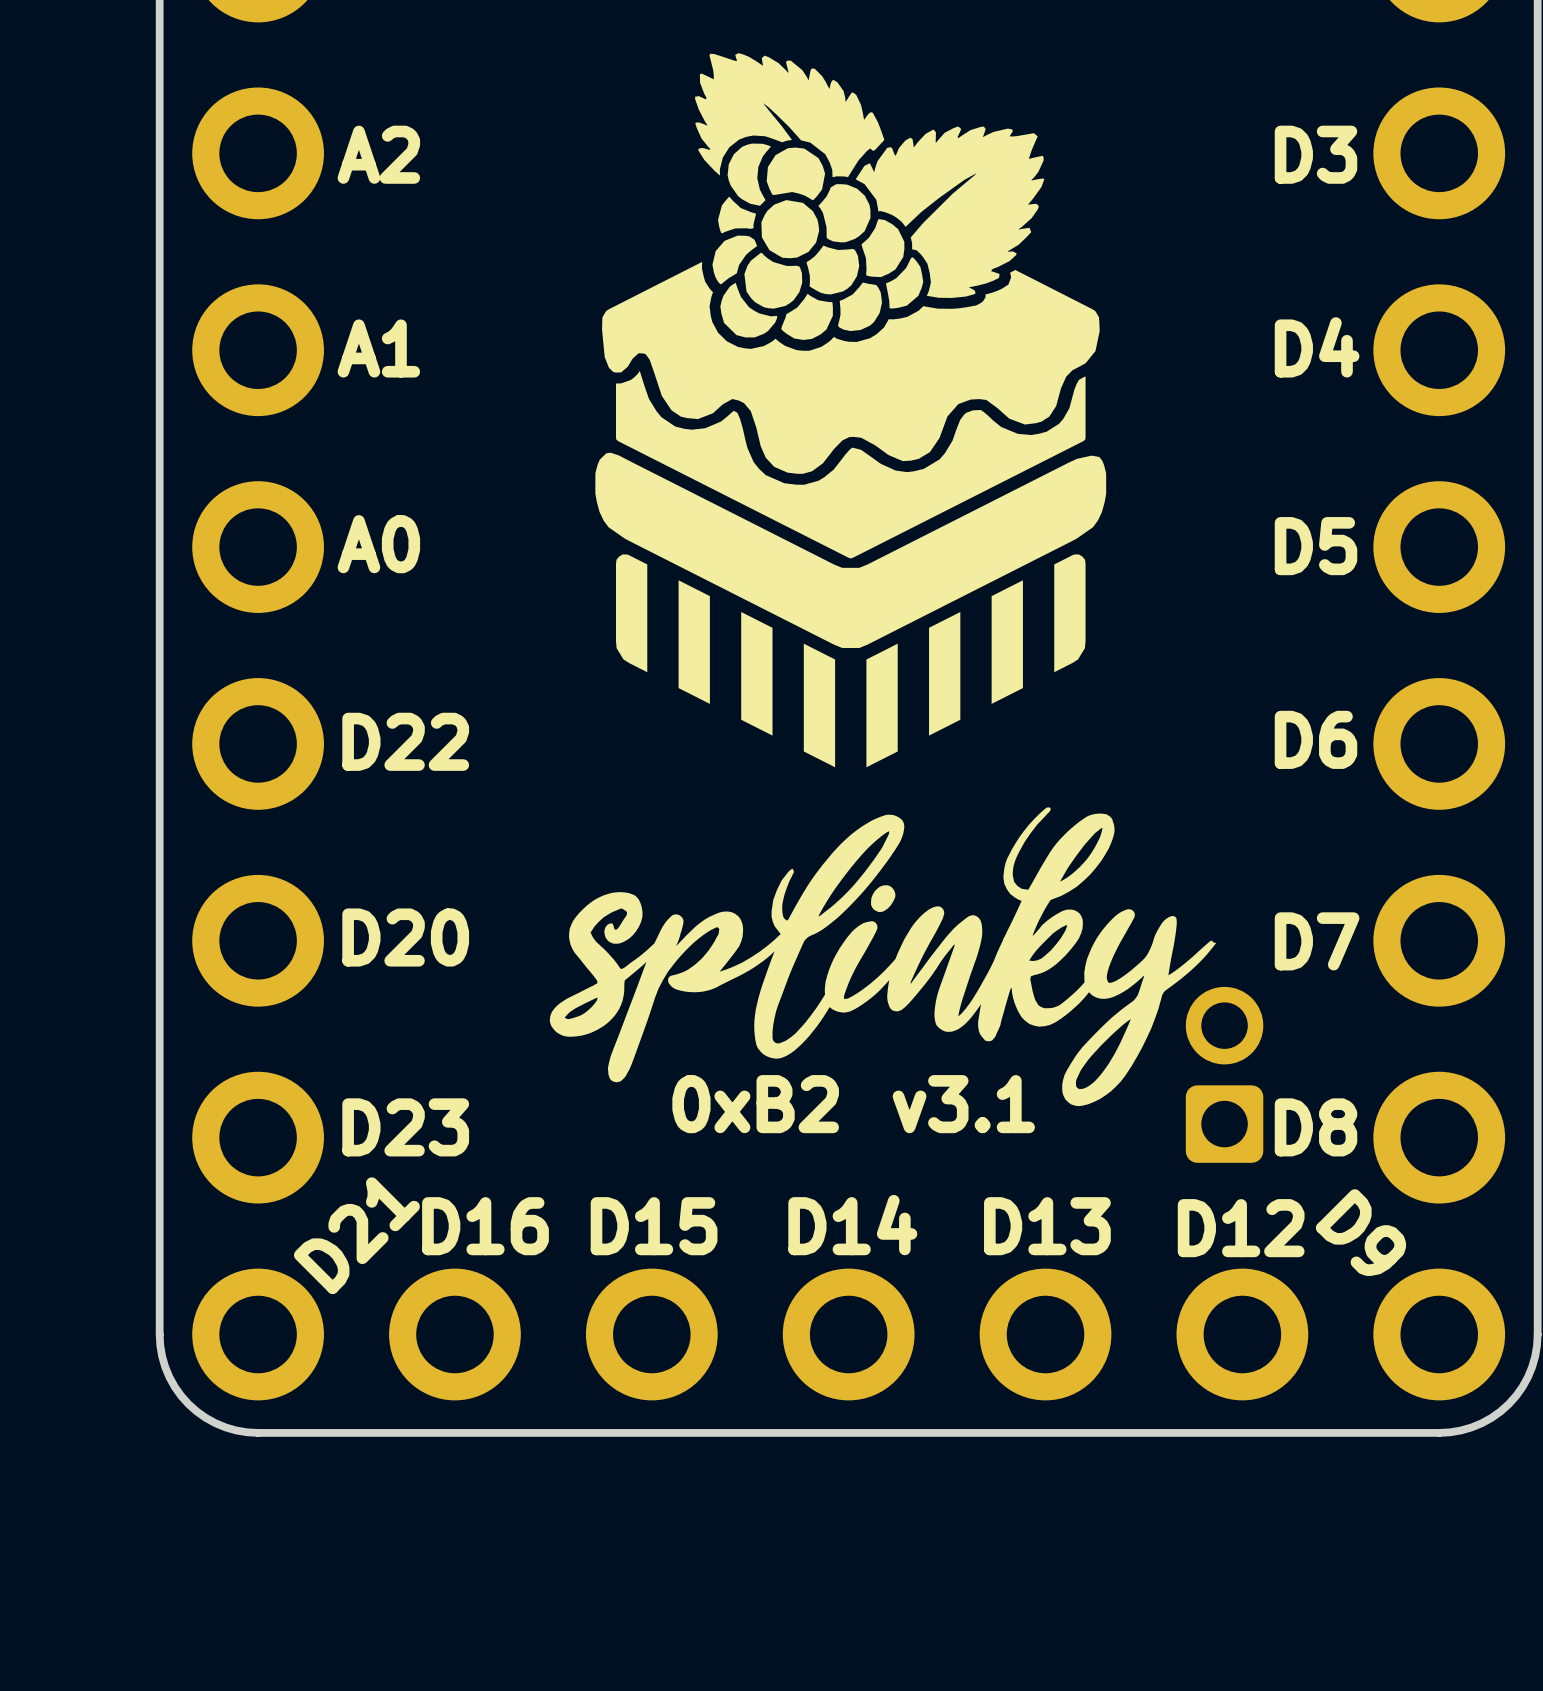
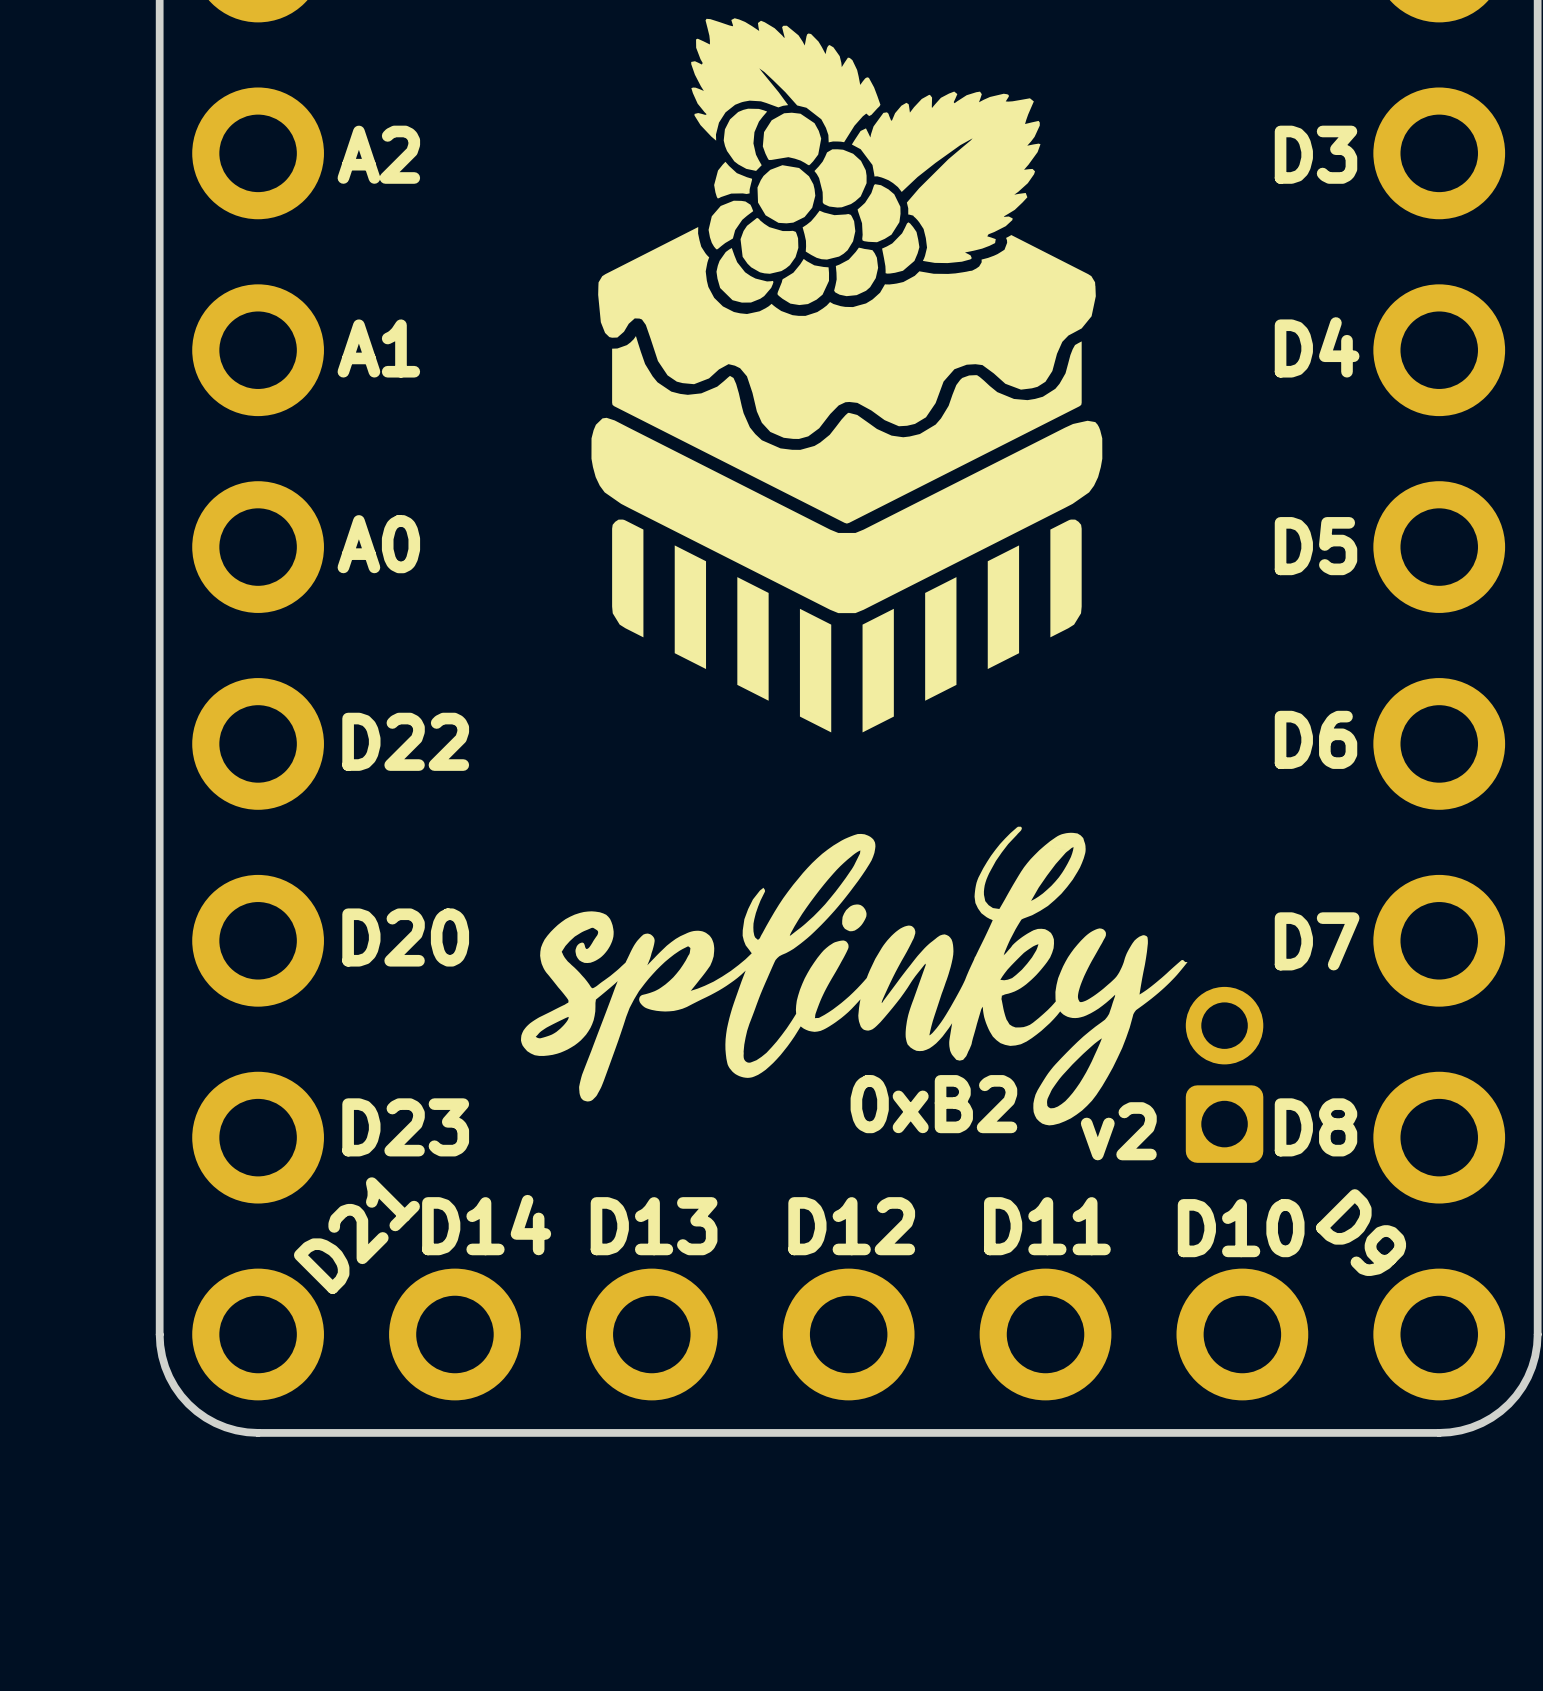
drawing position: (850, 410) -> (846, 375)
drawing position: (883, 956) -> (854, 976)
text position: 0xB2 (755, 1104) -> 0xB2 (933, 1104)
text: v3.1 (963, 1104) -> none
text: none -> v2 (1118, 1131)
part text: D14 (852, 1225) -> D12 (851, 1226)
part text: D16 (485, 1226) -> D14 (486, 1225)
part text: D15 (654, 1226) -> D13 (654, 1226)
part text: D13 (1047, 1226) -> D11 (1047, 1226)
part text: D12 (1241, 1228) -> D10 (1241, 1228)

